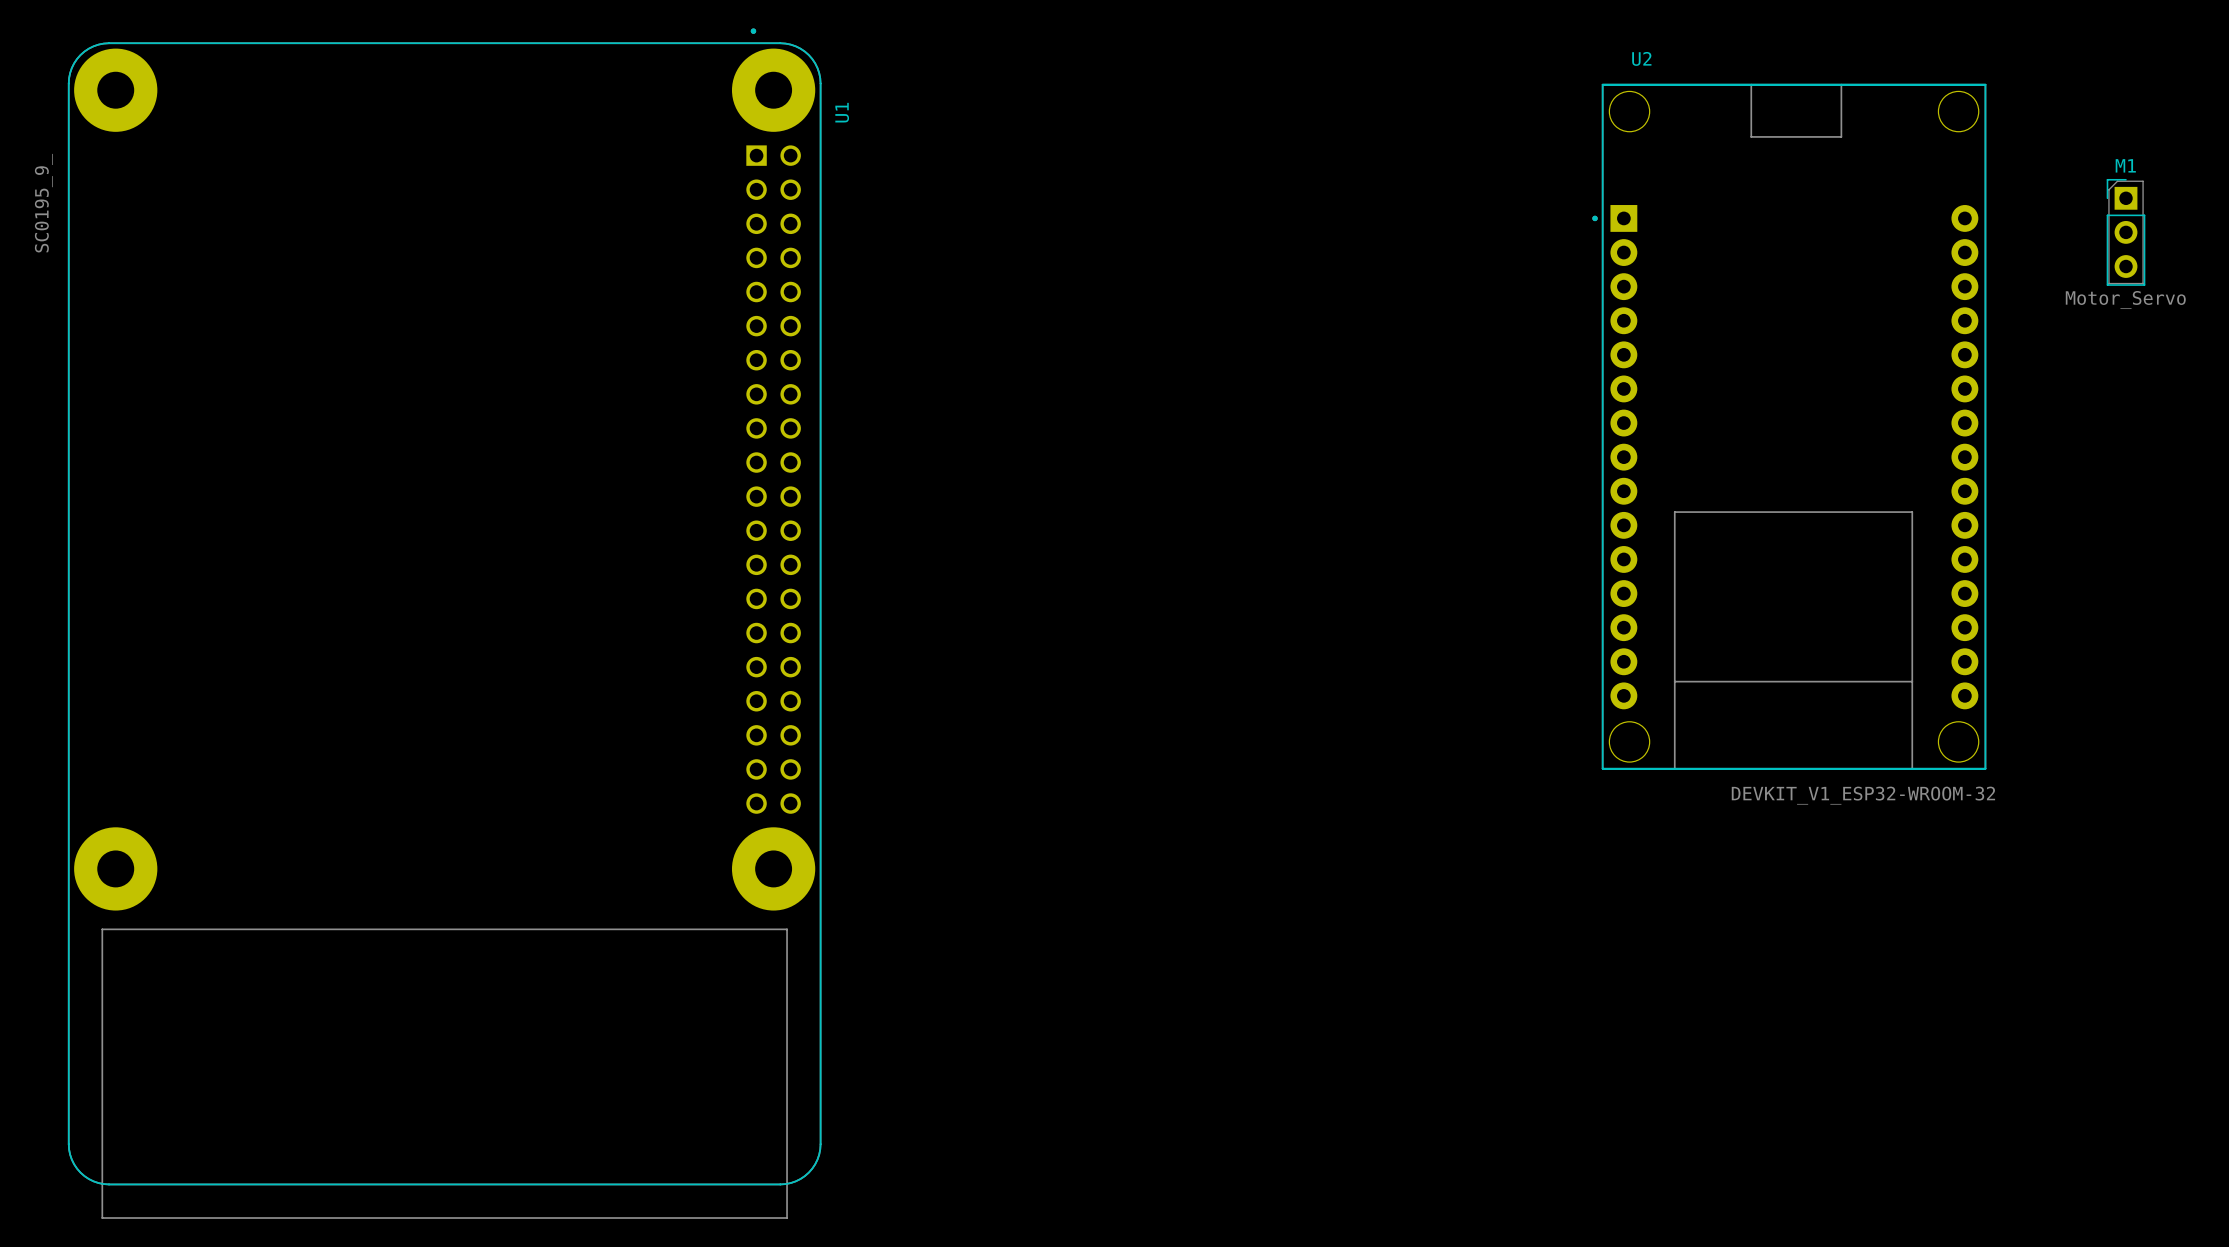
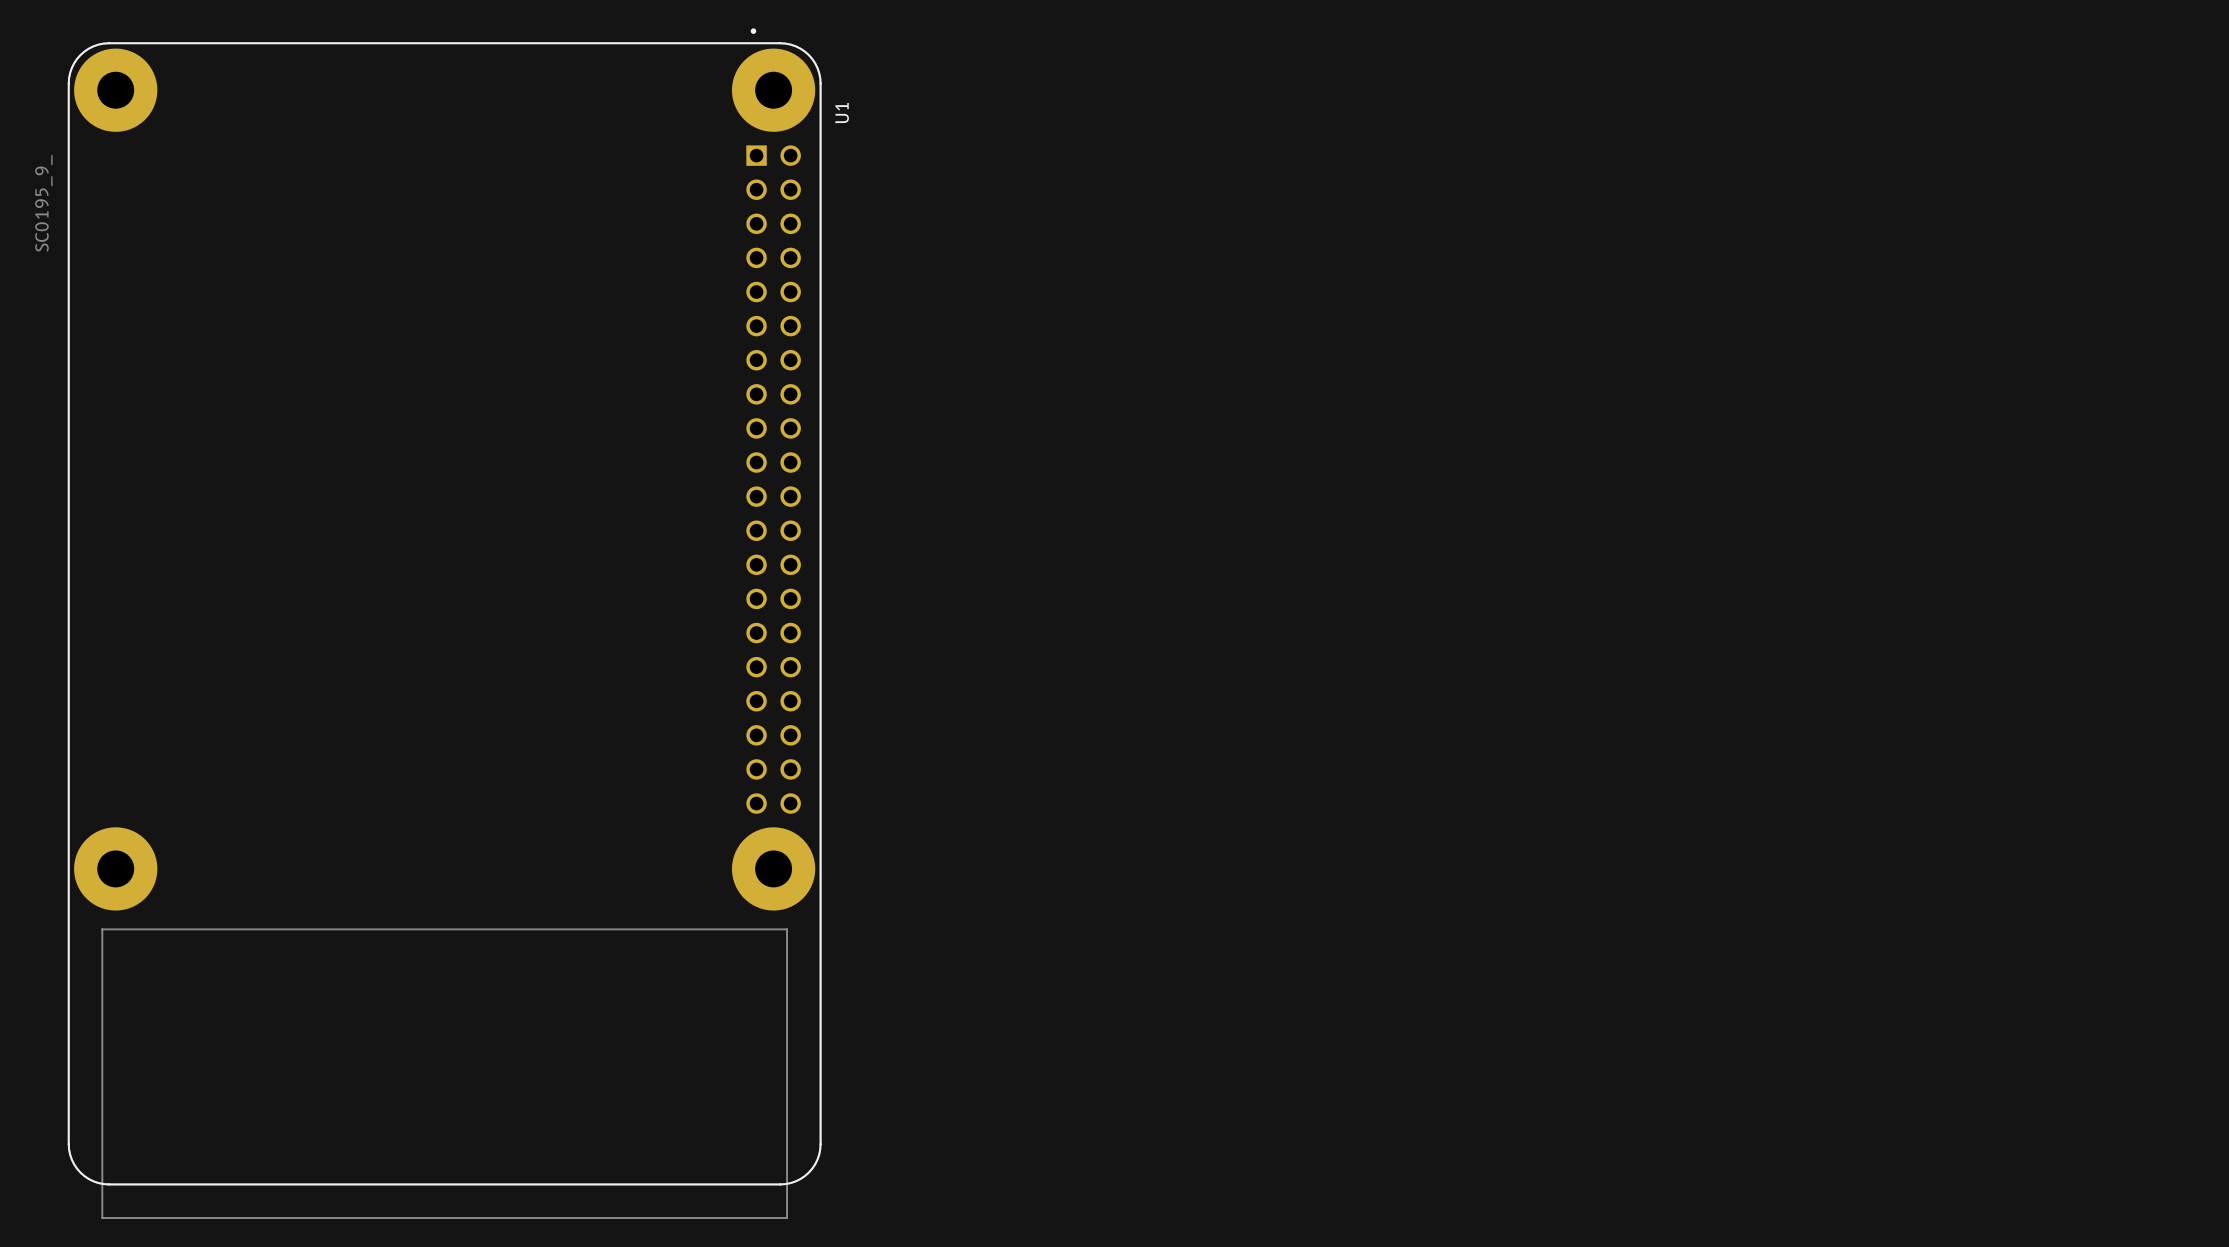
M1: Motor_Servo (2126, 232) -> none
U2: DEVKIT_V1_ESP32-WROOM-32 (1789, 426) -> none

